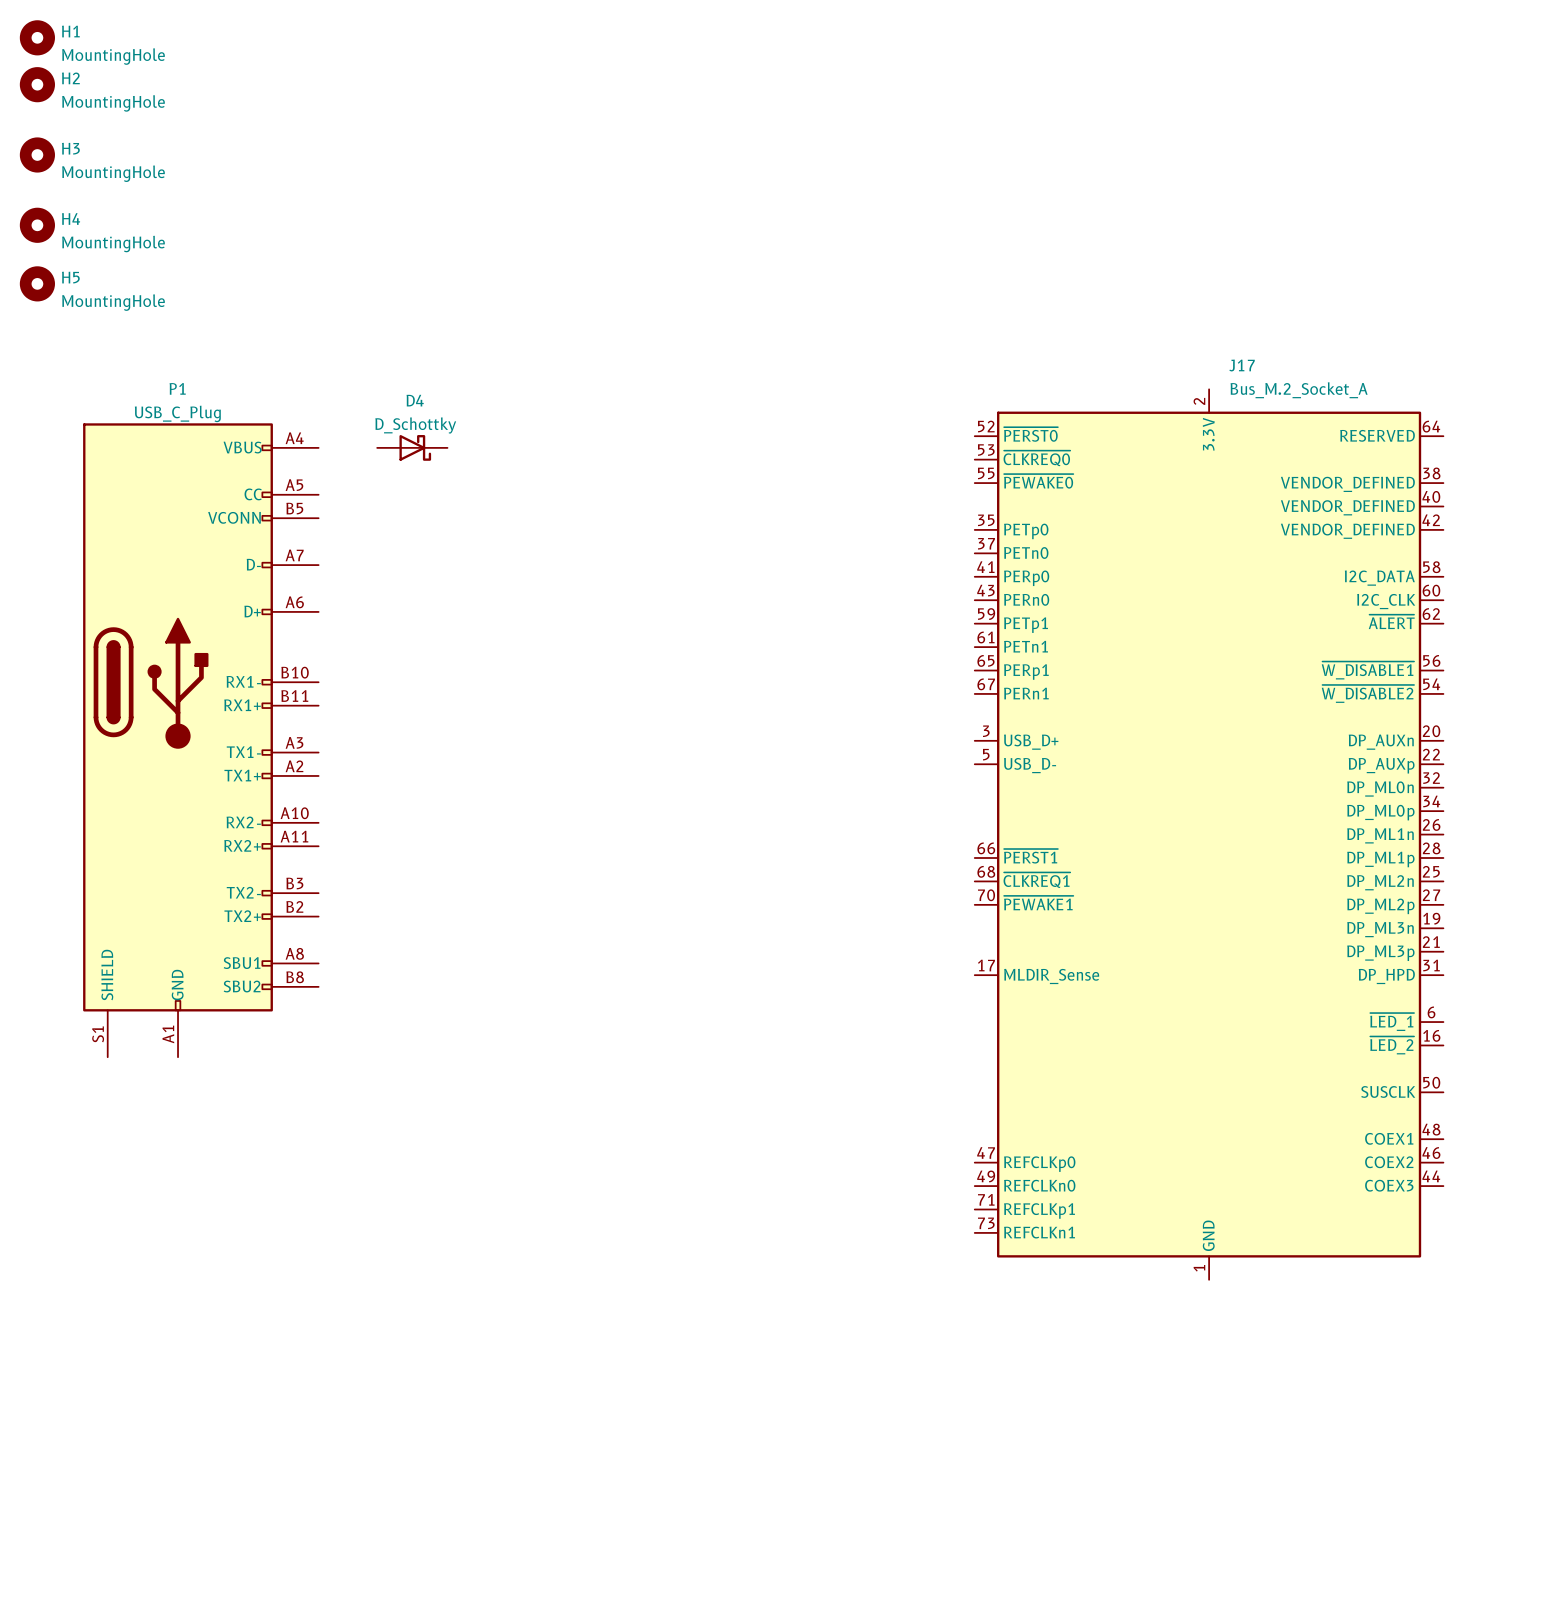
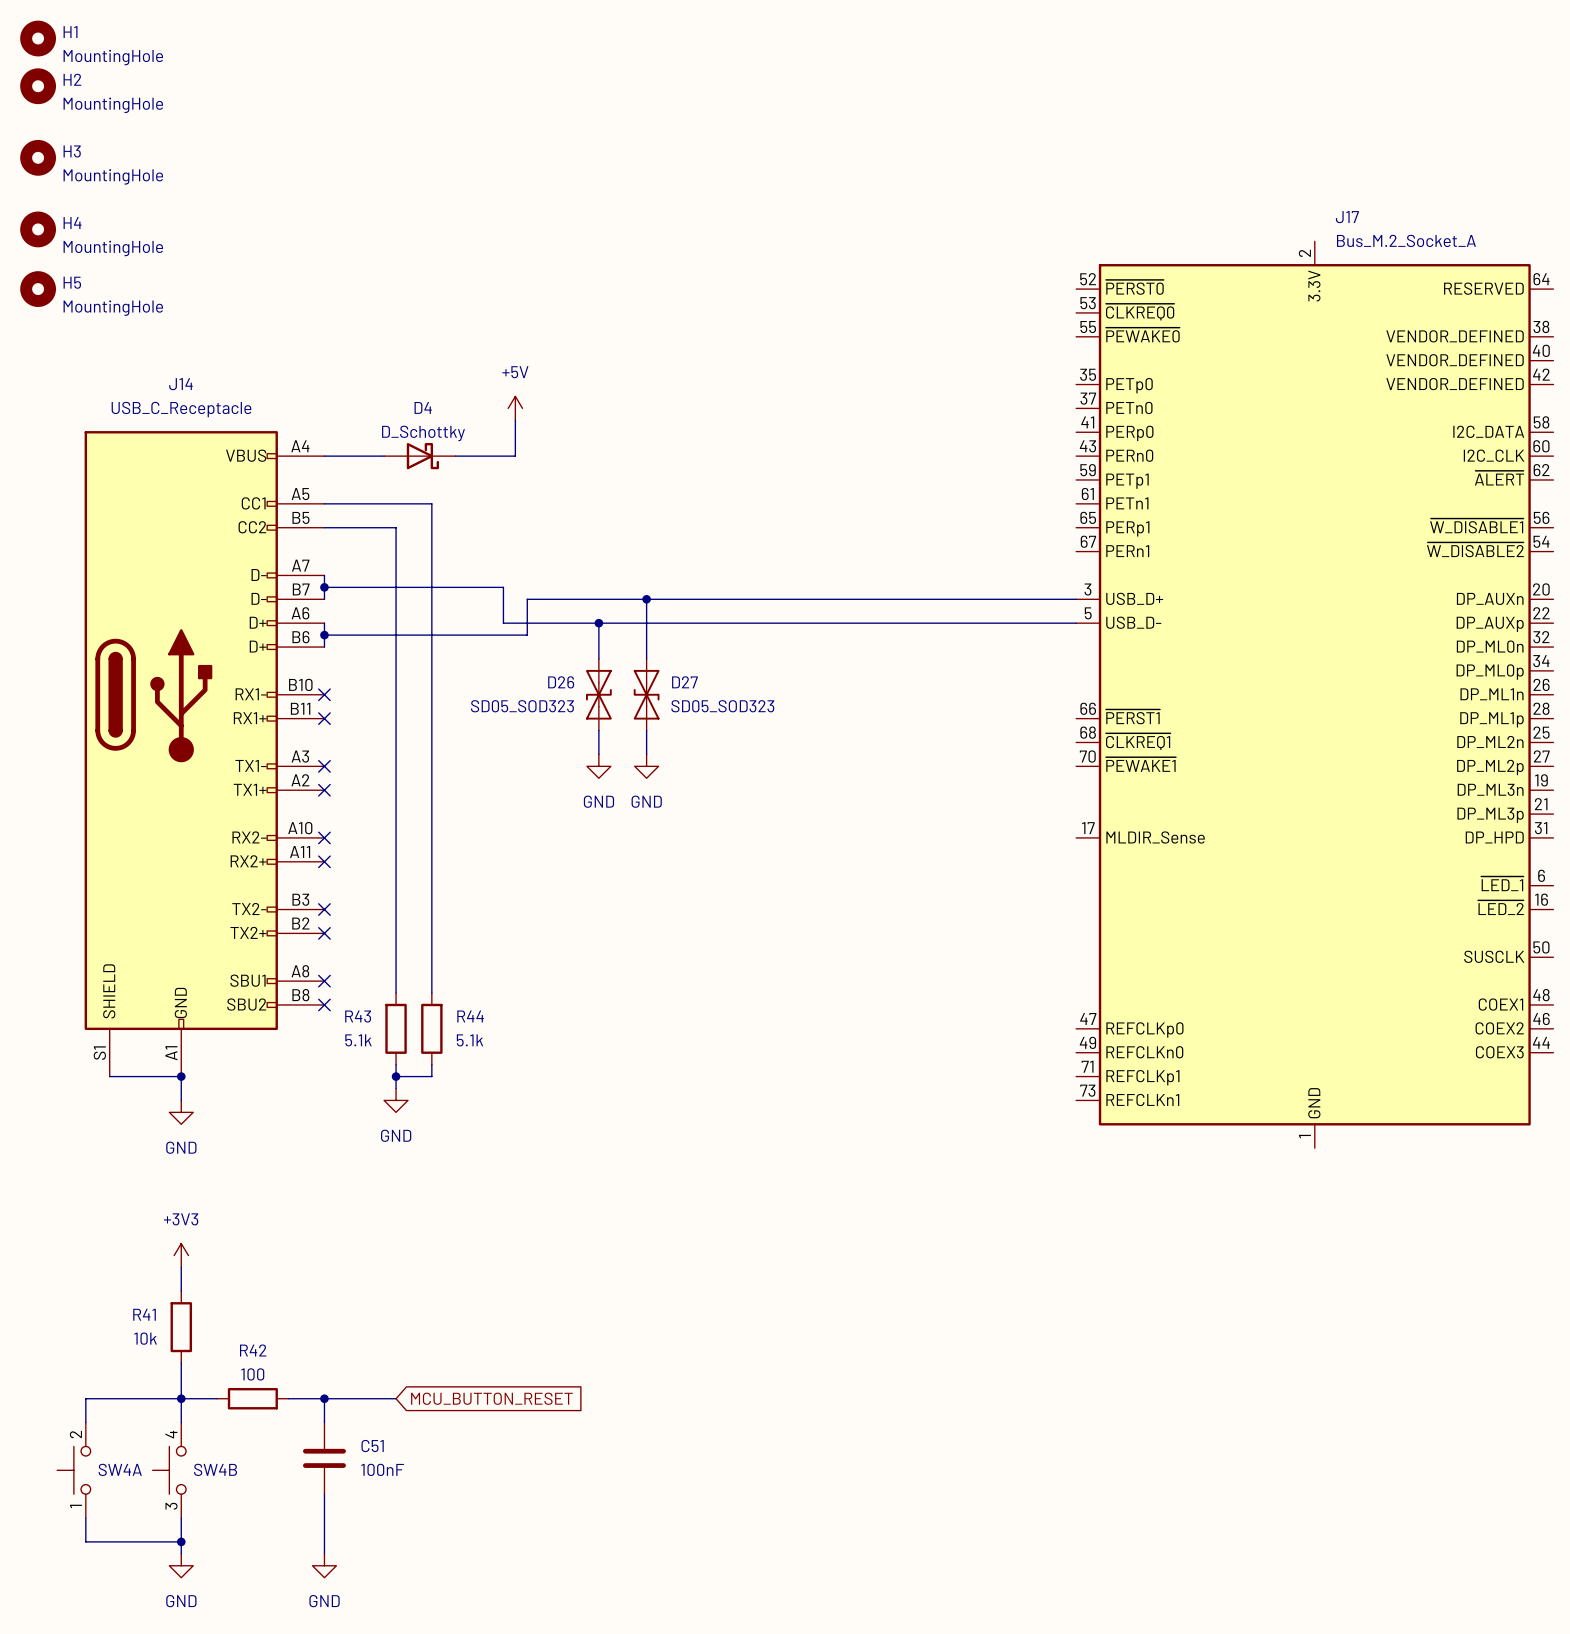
power symbol: none -> +5V (515, 408)
wire: none -> (515, 420) (515, 456) (455, 456)
wire: none -> (324, 456) (384, 456)
wire: none -> (324, 503) (431, 503) (431, 993)
wire: none -> (324, 527) (396, 527) (396, 993)
wire: none -> (324, 575) (324, 599)
wire: none -> (324, 587) (503, 587) (503, 623) (1076, 623)
junction: none -> (324, 587)
wire: none -> (646, 599) (646, 658)
junction: none -> (646, 599)
wire: none -> (1076, 599) (527, 599) (527, 635) (324, 635)
wire: none -> (324, 623) (324, 647)
wire: none -> (598, 623) (598, 658)
junction: none -> (598, 623)
junction: none -> (324, 635)
no-connect mark: none -> (324, 694)
D26: none -> SD05_SOD323 (598, 694)
D27: none -> SD05_SOD323 (646, 694)
no-connect mark: none -> (324, 718)
wire: none -> (598, 730) (598, 754)
wire: none -> (646, 730) (646, 754)
P1: USB_C_Plug (200, 740) -> none
J14: none -> USB_C_Receptacle (204, 753)
no-connect mark: none -> (324, 766)
power symbol: none -> GND (598, 766)
power symbol: none -> GND (646, 766)
no-connect mark: none -> (324, 790)
no-connect mark: none -> (324, 837)
J17 position: (1209, 834) -> (1314, 694)
no-connect mark: none -> (324, 861)
no-connect mark: none -> (324, 909)
no-connect mark: none -> (324, 933)
no-connect mark: none -> (324, 981)
no-connect mark: none -> (324, 1004)
R43: none -> 5.1k (396, 1028)
R44: none -> 5.1k (431, 1028)
wire: none -> (396, 1064) (396, 1088)
wire: none -> (431, 1064) (431, 1076) (396, 1076)
wire: none -> (109, 1076) (181, 1076) (181, 1100)
junction: none -> (181, 1076)
junction: none -> (396, 1076)
power symbol: none -> GND (396, 1100)
power symbol: none -> GND (181, 1112)
power symbol: none -> +3V3 (181, 1255)
wire: none -> (181, 1267) (181, 1291)
R41: none -> 10k (181, 1327)
wire: none -> (181, 1362) (181, 1422)
junction: none -> (181, 1398)
wire: none -> (217, 1398) (85, 1398) (85, 1422)
R42: none -> 100 (252, 1398)
wire: none -> (288, 1398) (396, 1398)
wire: none -> (324, 1398) (324, 1422)
junction: none -> (324, 1398)
global label: none -> MCU_BUTTON_RESET (491, 1398)
C51: none -> 100nF (324, 1458)
SW4A: none -> (73, 1470)
SW4B: none -> (169, 1470)
wire: none -> (324, 1494) (324, 1553)
wire: none -> (85, 1518) (85, 1541) (181, 1541)
wire: none -> (181, 1518) (181, 1553)
junction: none -> (181, 1541)
power symbol: none -> GND (181, 1565)
power symbol: none -> GND (324, 1565)

